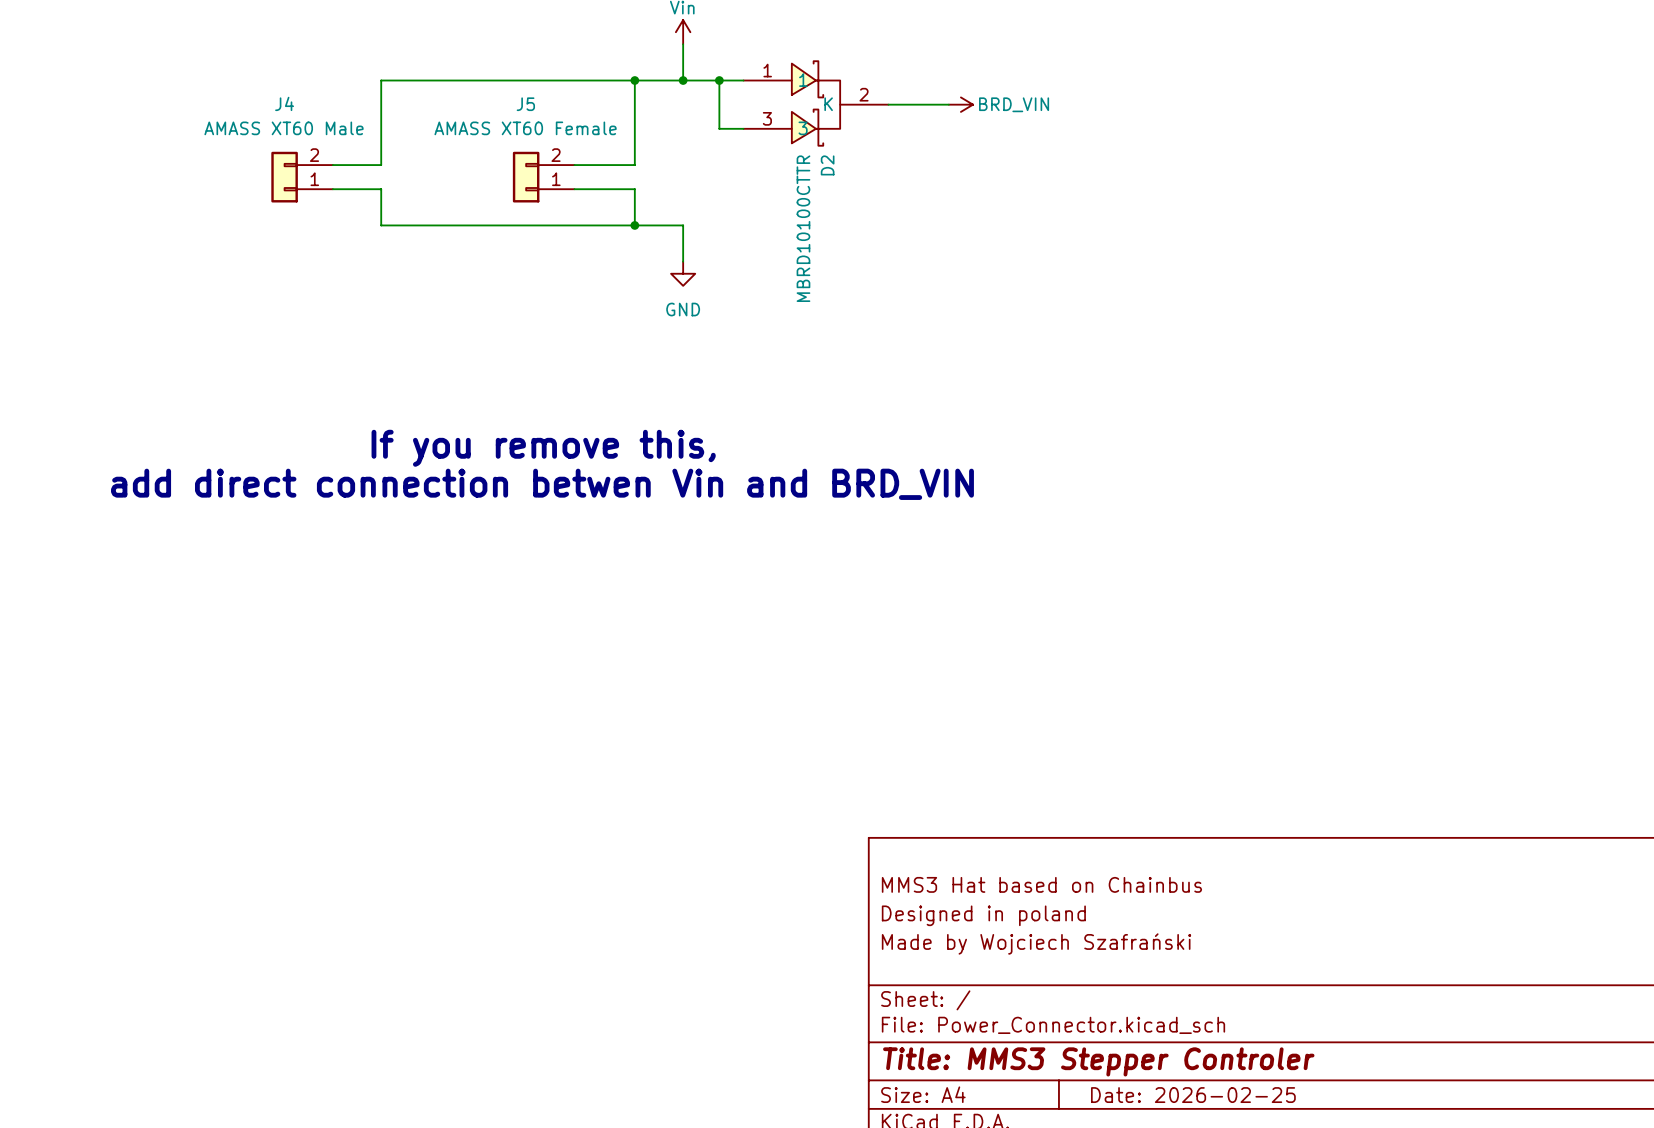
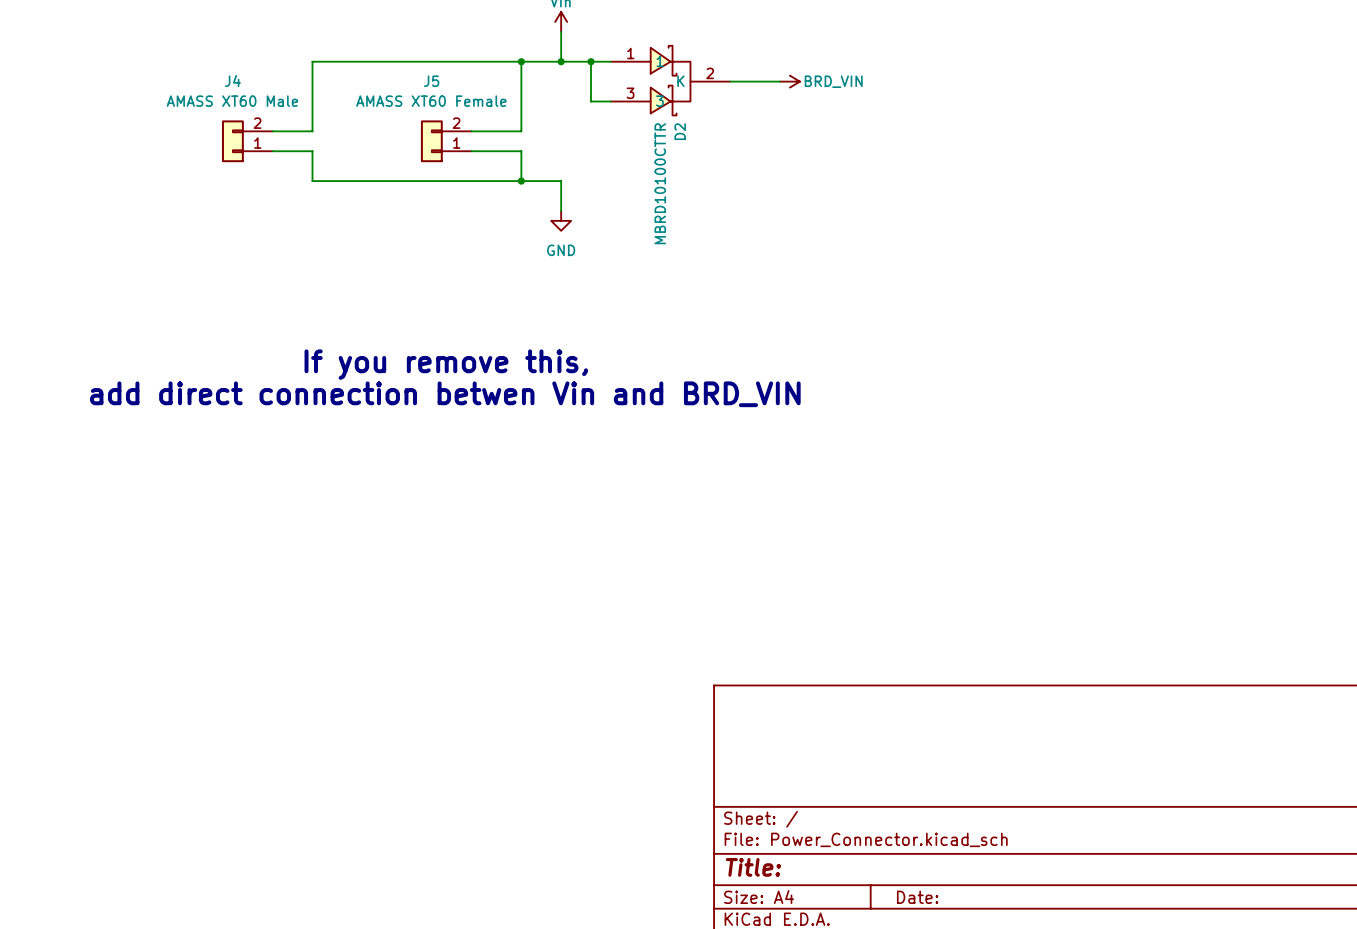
title block: MMS3 Hat based on Chainbus (1041, 884) -> none
title block: Designed in poland (983, 915) -> none
title block: Made by Wojciech Szafrański (1036, 943) -> none
title block: Title: MMS3 Stepper Controler (1098, 1061) -> Title: (753, 867)
title block: Date: 2026-02-25 (1193, 1095) -> Date: (917, 897)

